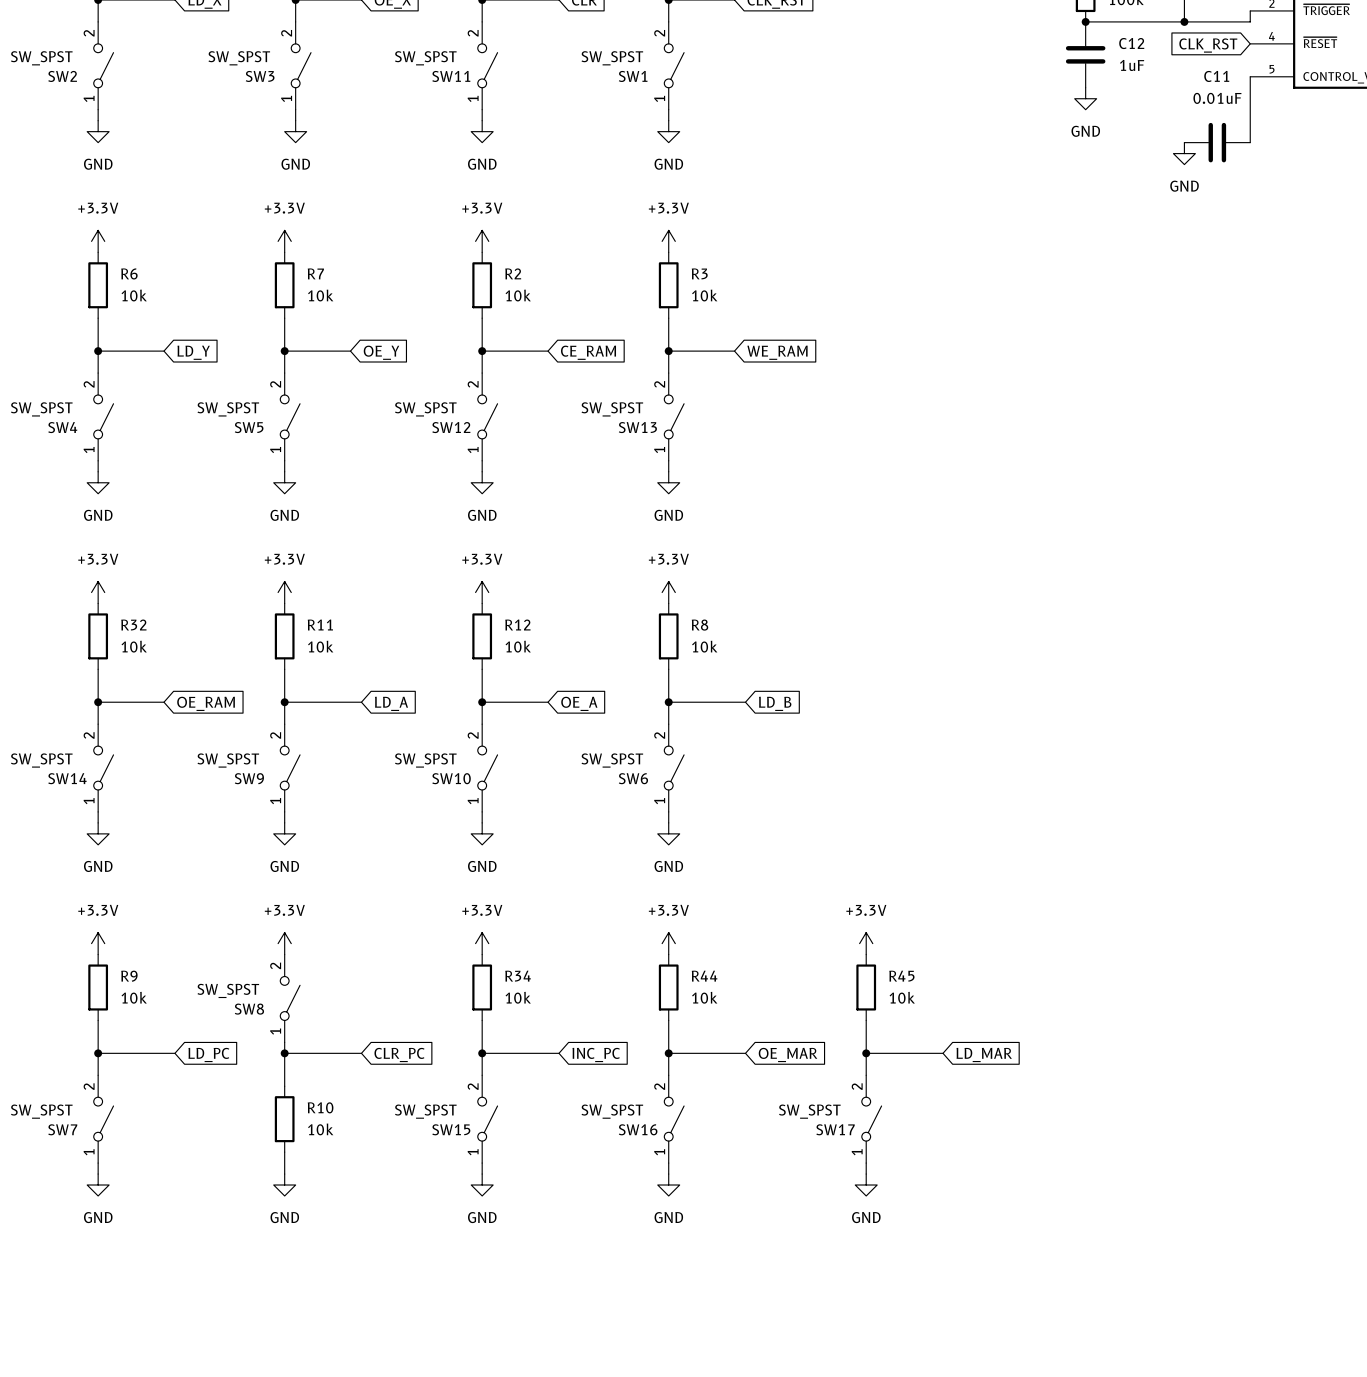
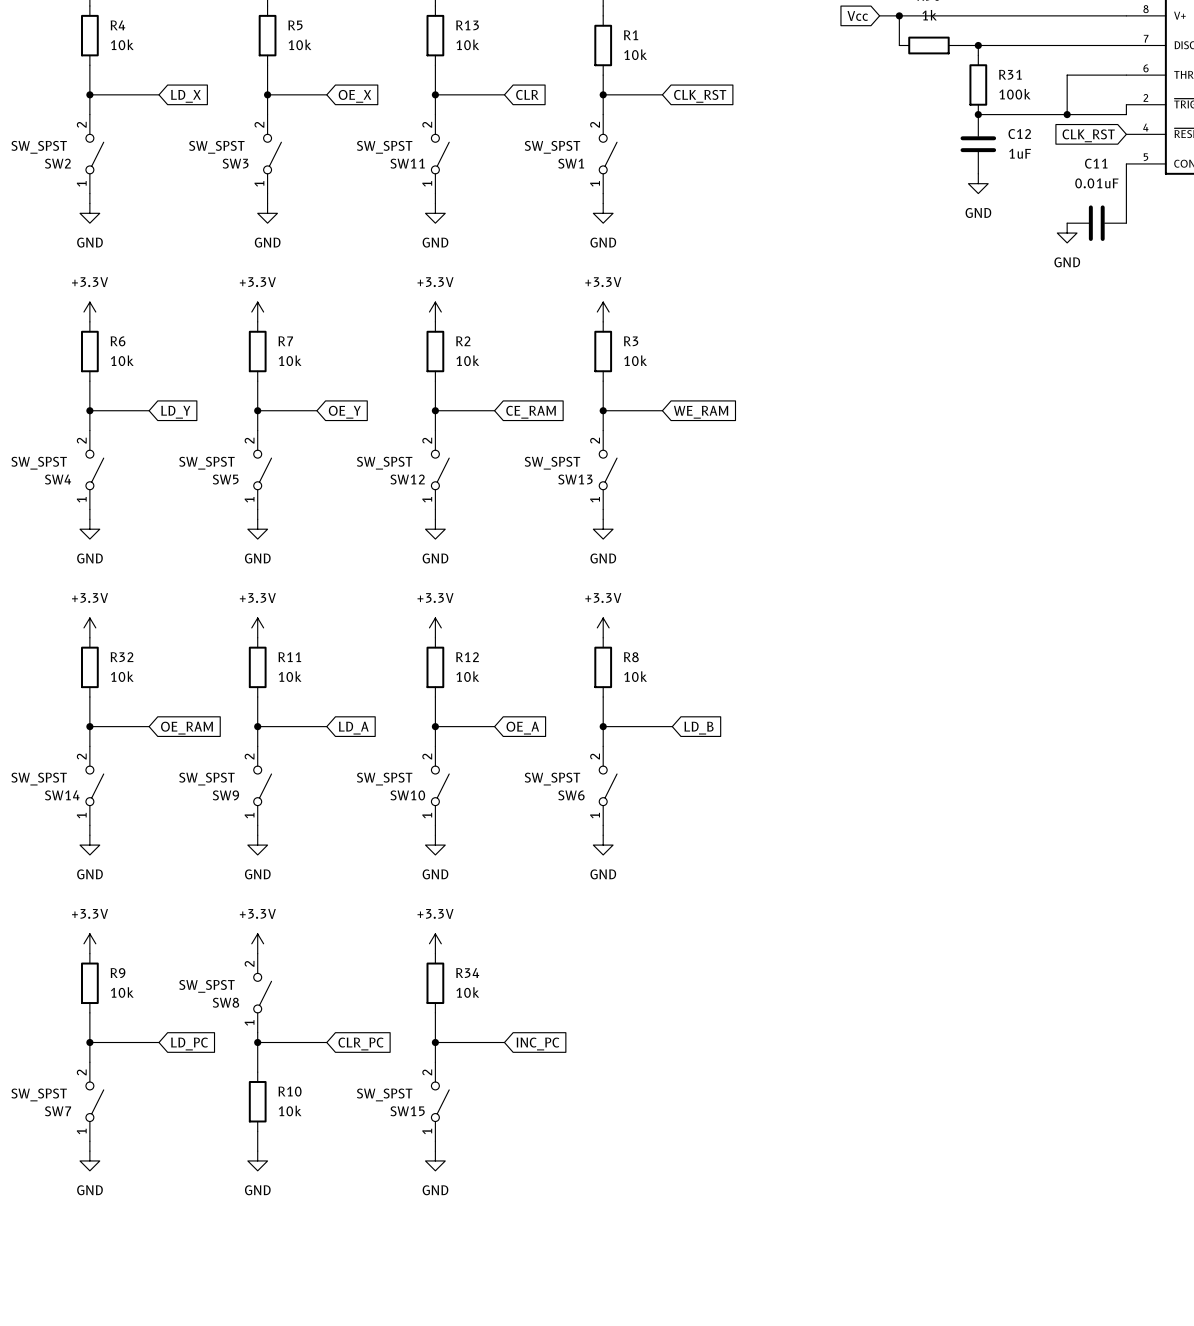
power symbol: +3.3V (668, 943) -> none
power symbol: +3.3V (866, 943) -> none
R44: 10k (668, 987) -> none
R45: 10k (866, 987) -> none
wire: (668, 1020) (668, 1075) -> none
wire: (866, 1020) (866, 1075) -> none
wire: (668, 1053) (745, 1053) -> none
junction: (668, 1053) -> none
wire: (866, 1053) (943, 1053) -> none
junction: (866, 1053) -> none
global label: OE_MAR (788, 1054) -> none
global label: LD_MAR (984, 1054) -> none
SW16: SW_SPST (674, 1119) -> none
SW17: SW_SPST (871, 1119) -> none
wire: (668, 1163) (668, 1174) -> none
wire: (866, 1163) (866, 1174) -> none
power symbol: GND (668, 1185) -> none
power symbol: GND (866, 1185) -> none

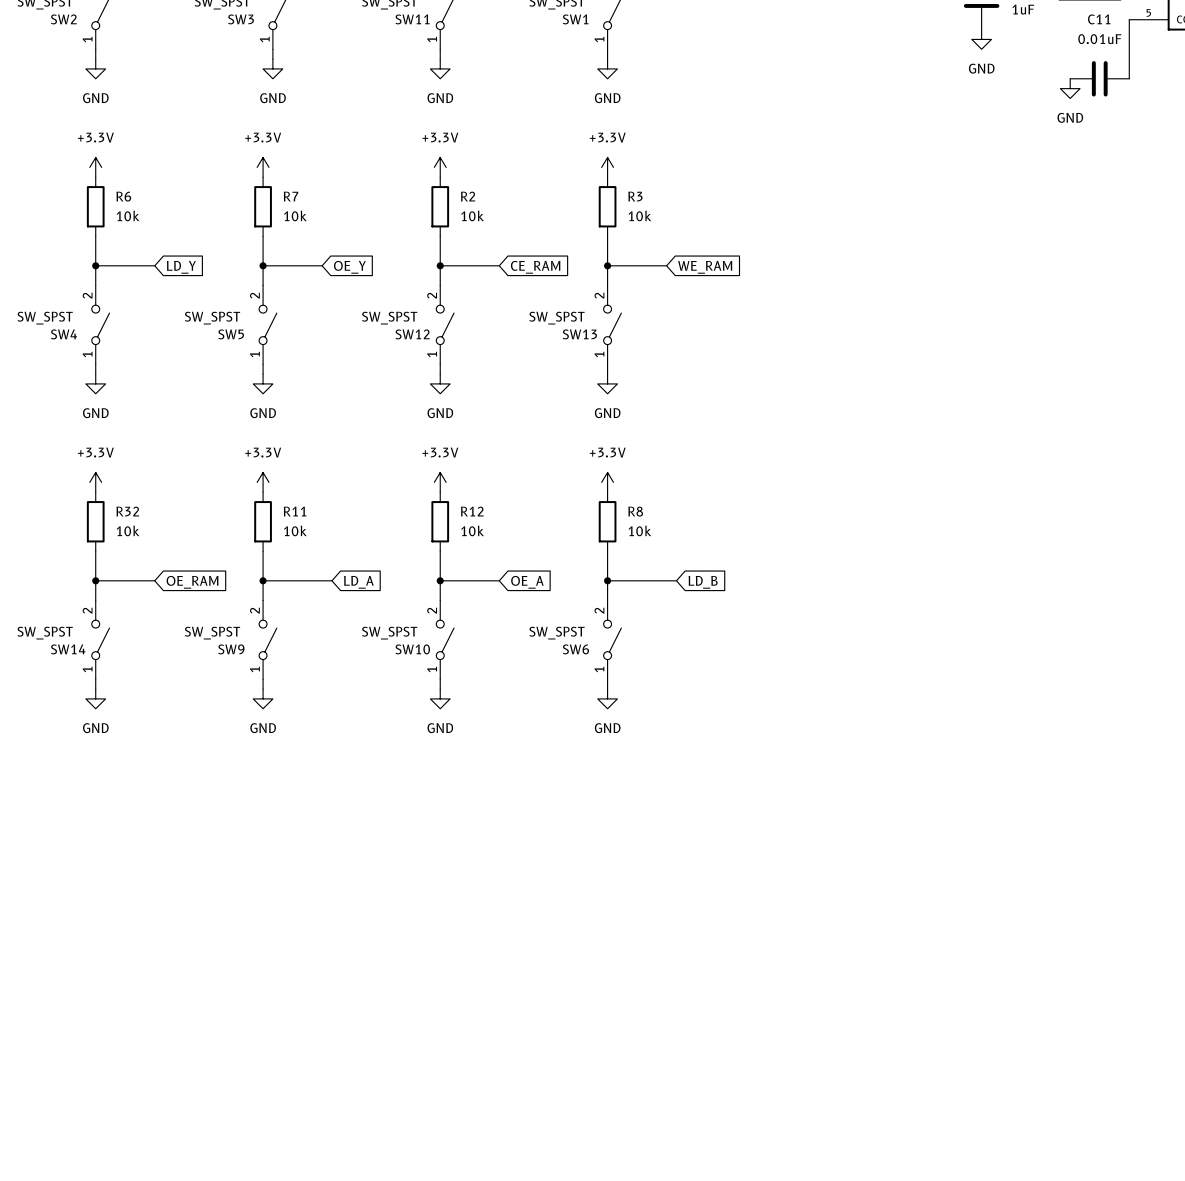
power symbol: +3.3V (89, 943) -> none
power symbol: +3.3V (257, 943) -> none
power symbol: +3.3V (435, 943) -> none
R9: 10k (89, 983) -> none
R34: 10k (435, 983) -> none
SW8: SW_SPST (262, 993) -> none
wire: (89, 1012) (89, 1062) -> none
wire: (435, 1012) (435, 1062) -> none
wire: (257, 1032) (257, 1072) -> none
wire: (89, 1042) (158, 1042) -> none
junction: (89, 1042) -> none
wire: (257, 1042) (326, 1042) -> none
junction: (257, 1042) -> none
wire: (435, 1042) (504, 1042) -> none
junction: (435, 1042) -> none
global label: LD_PC (189, 1043) -> none
global label: CLR_PC (361, 1043) -> none
global label: INC_PC (537, 1043) -> none
SW7: SW_SPST (94, 1101) -> none
R10: 10k (257, 1101) -> none
SW15: SW_SPST (440, 1101) -> none
wire: (257, 1131) (257, 1151) -> none
wire: (89, 1141) (89, 1151) -> none
wire: (435, 1141) (435, 1151) -> none
power symbol: GND (89, 1160) -> none
power symbol: GND (257, 1160) -> none
power symbol: GND (435, 1160) -> none

